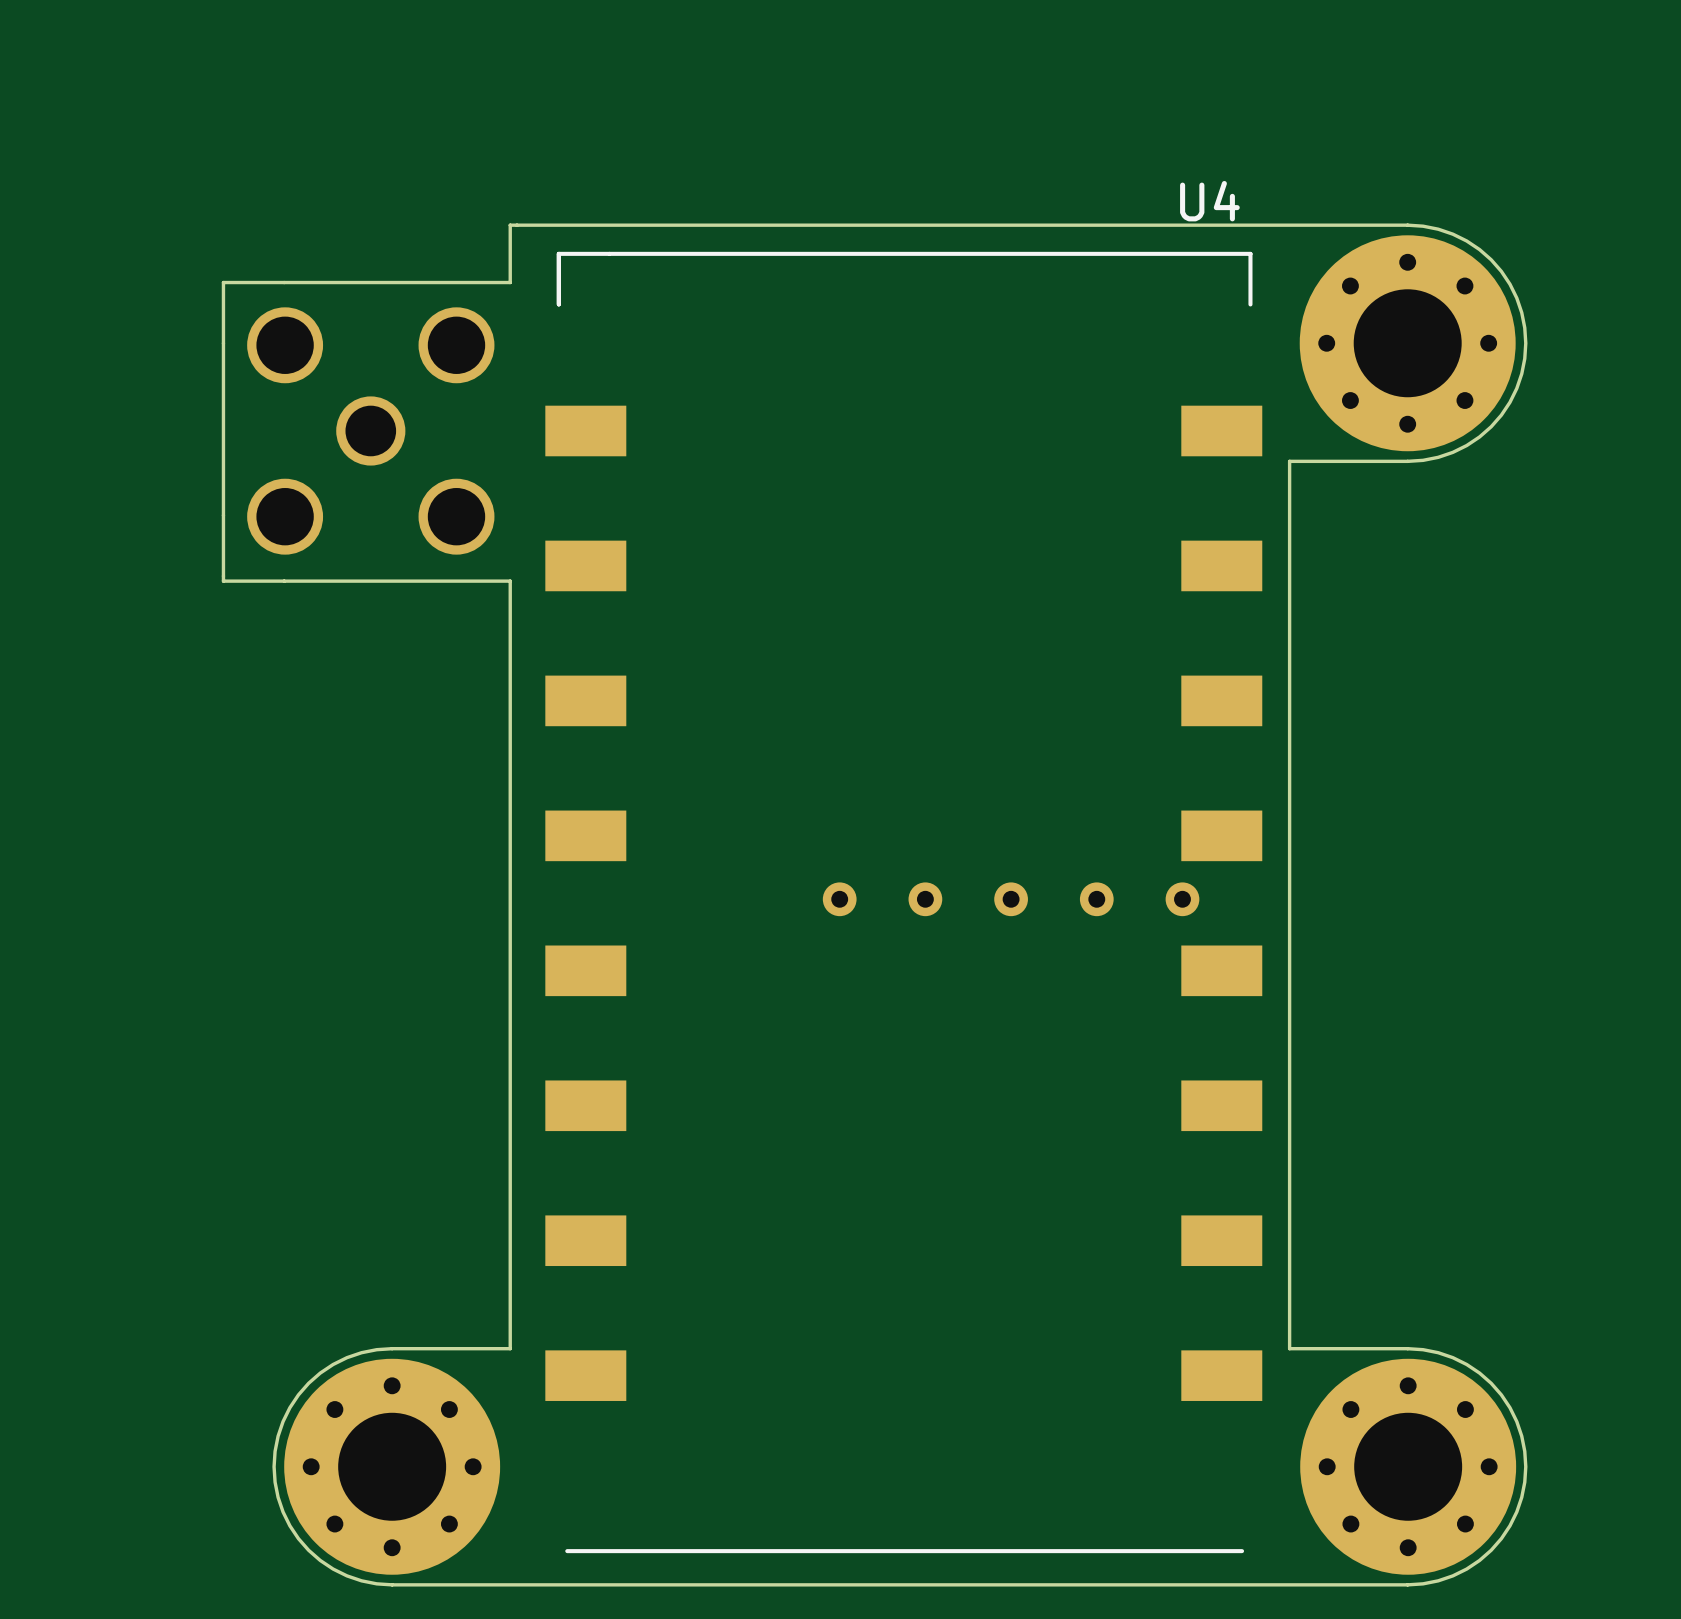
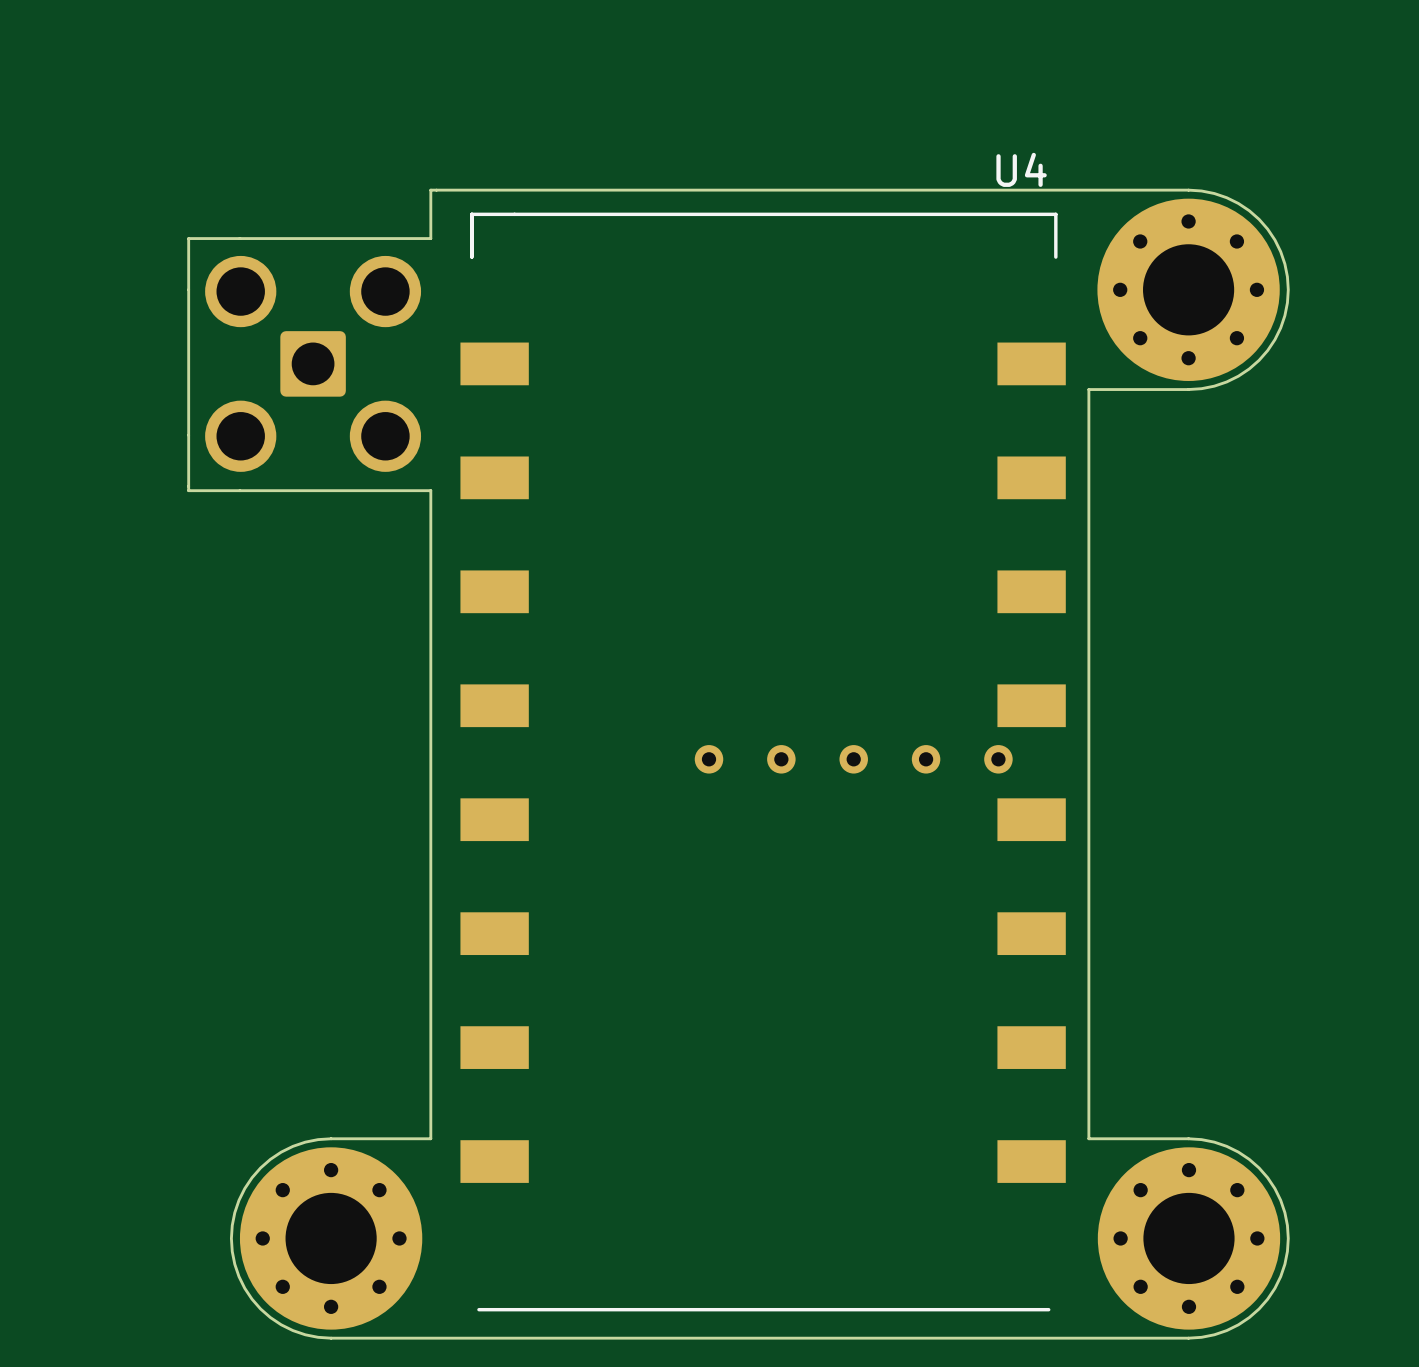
part footprint: [247, 307, 495, 555] -> [205, 255, 422, 472]

